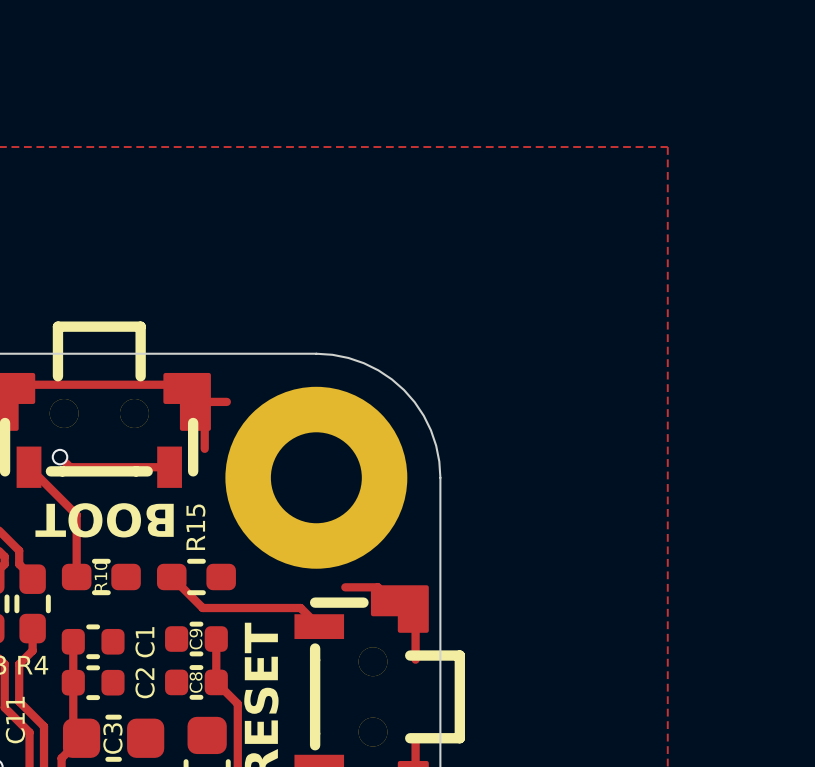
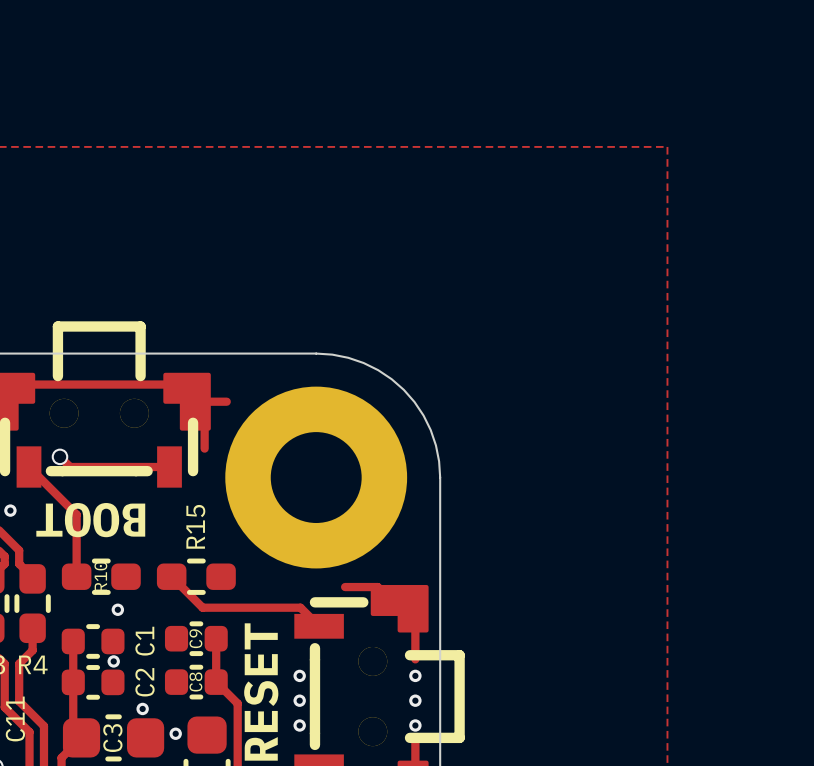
via: none -> (10, 510)
via: none -> (117, 609)
via: none -> (113, 661)
via: none -> (299, 675)
via: none -> (415, 675)
via: none -> (299, 700)
via: none -> (415, 700)
via: none -> (142, 708)
via: none -> (299, 725)
via: none -> (415, 725)
via: none -> (175, 733)

